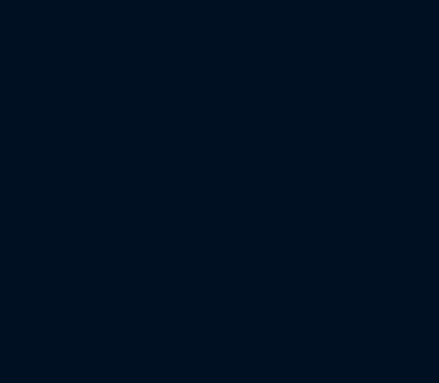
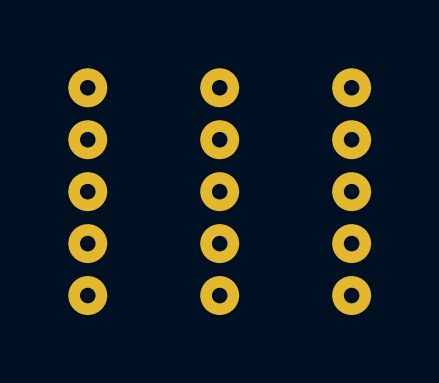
part: none -> (87, 191)
part: none -> (219, 191)
part: none -> (351, 191)

